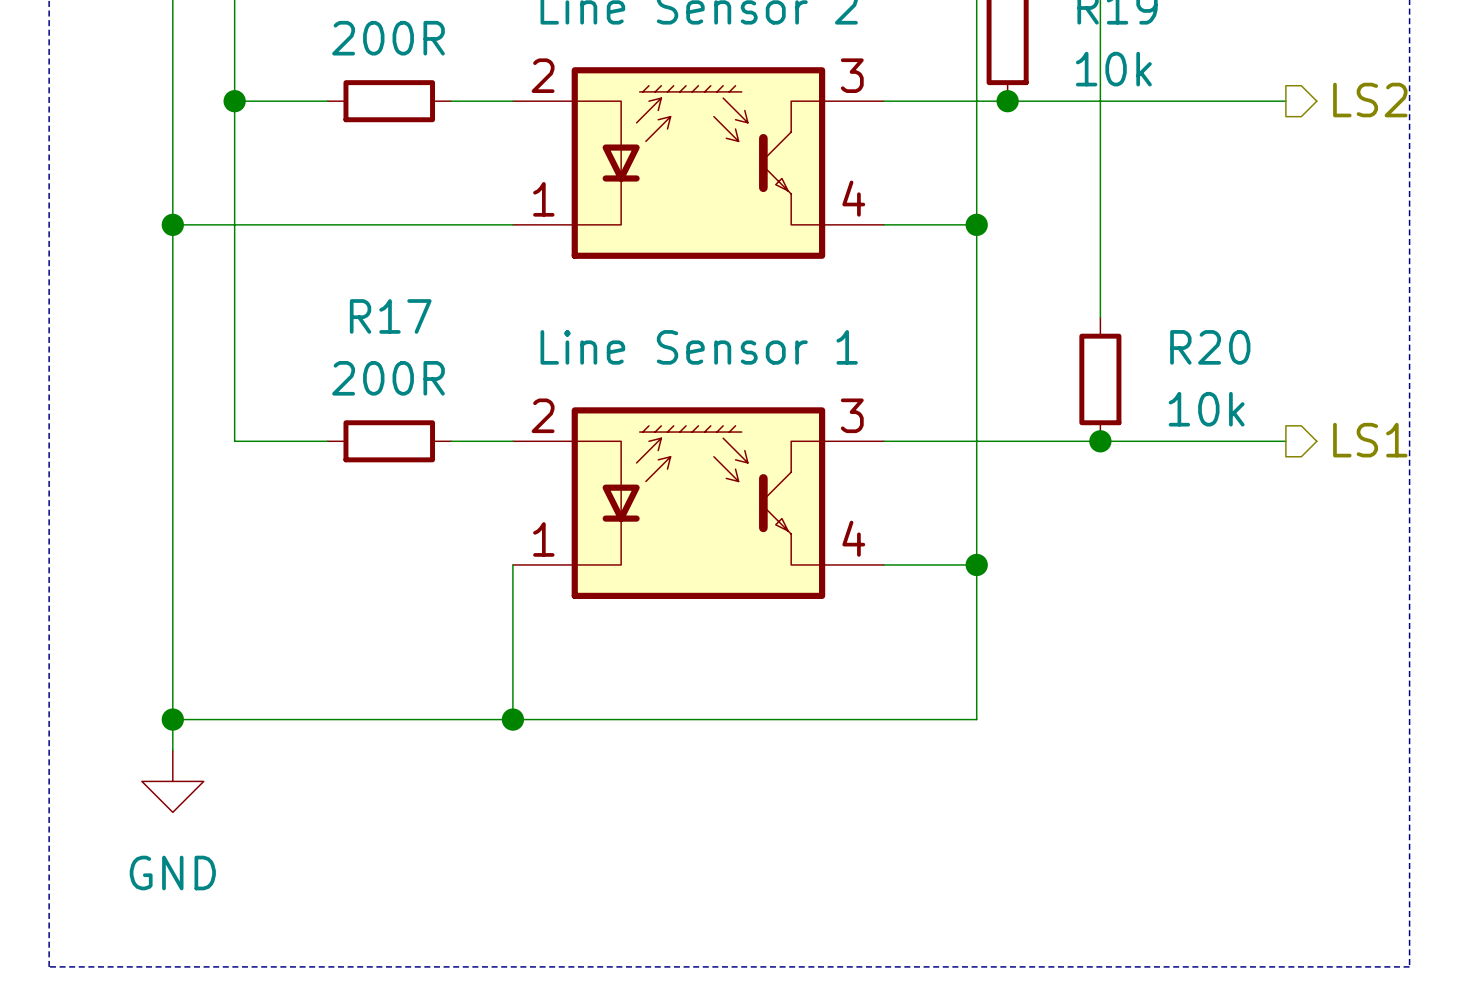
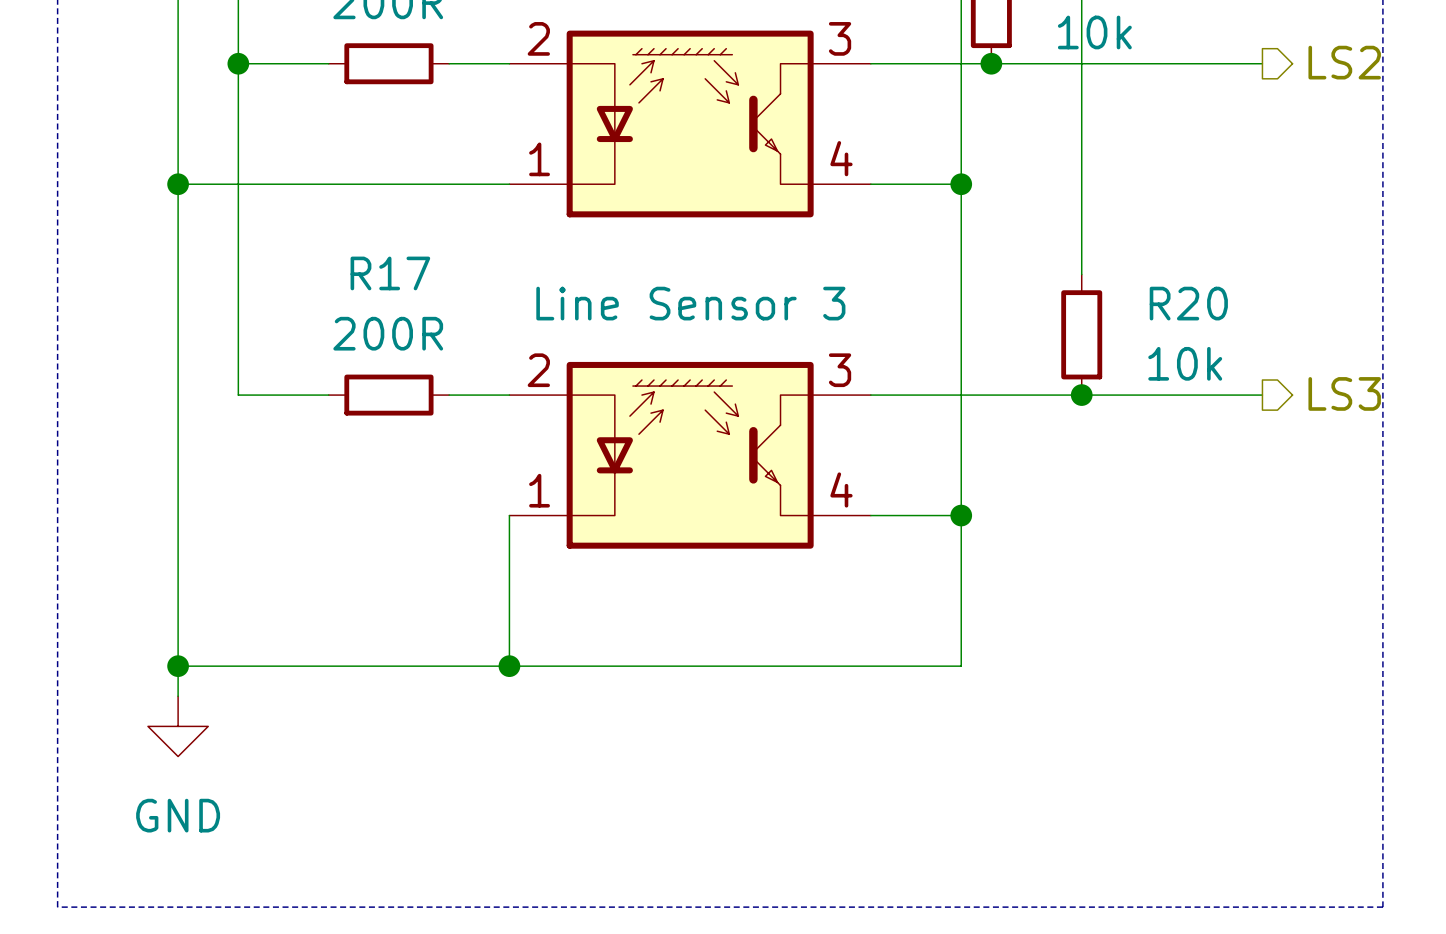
part text: Line Sensor 1 (699, 347) -> Line Sensor 3 (690, 303)
hierarchical label: LS1 (1370, 440) -> LS3 (1344, 393)

